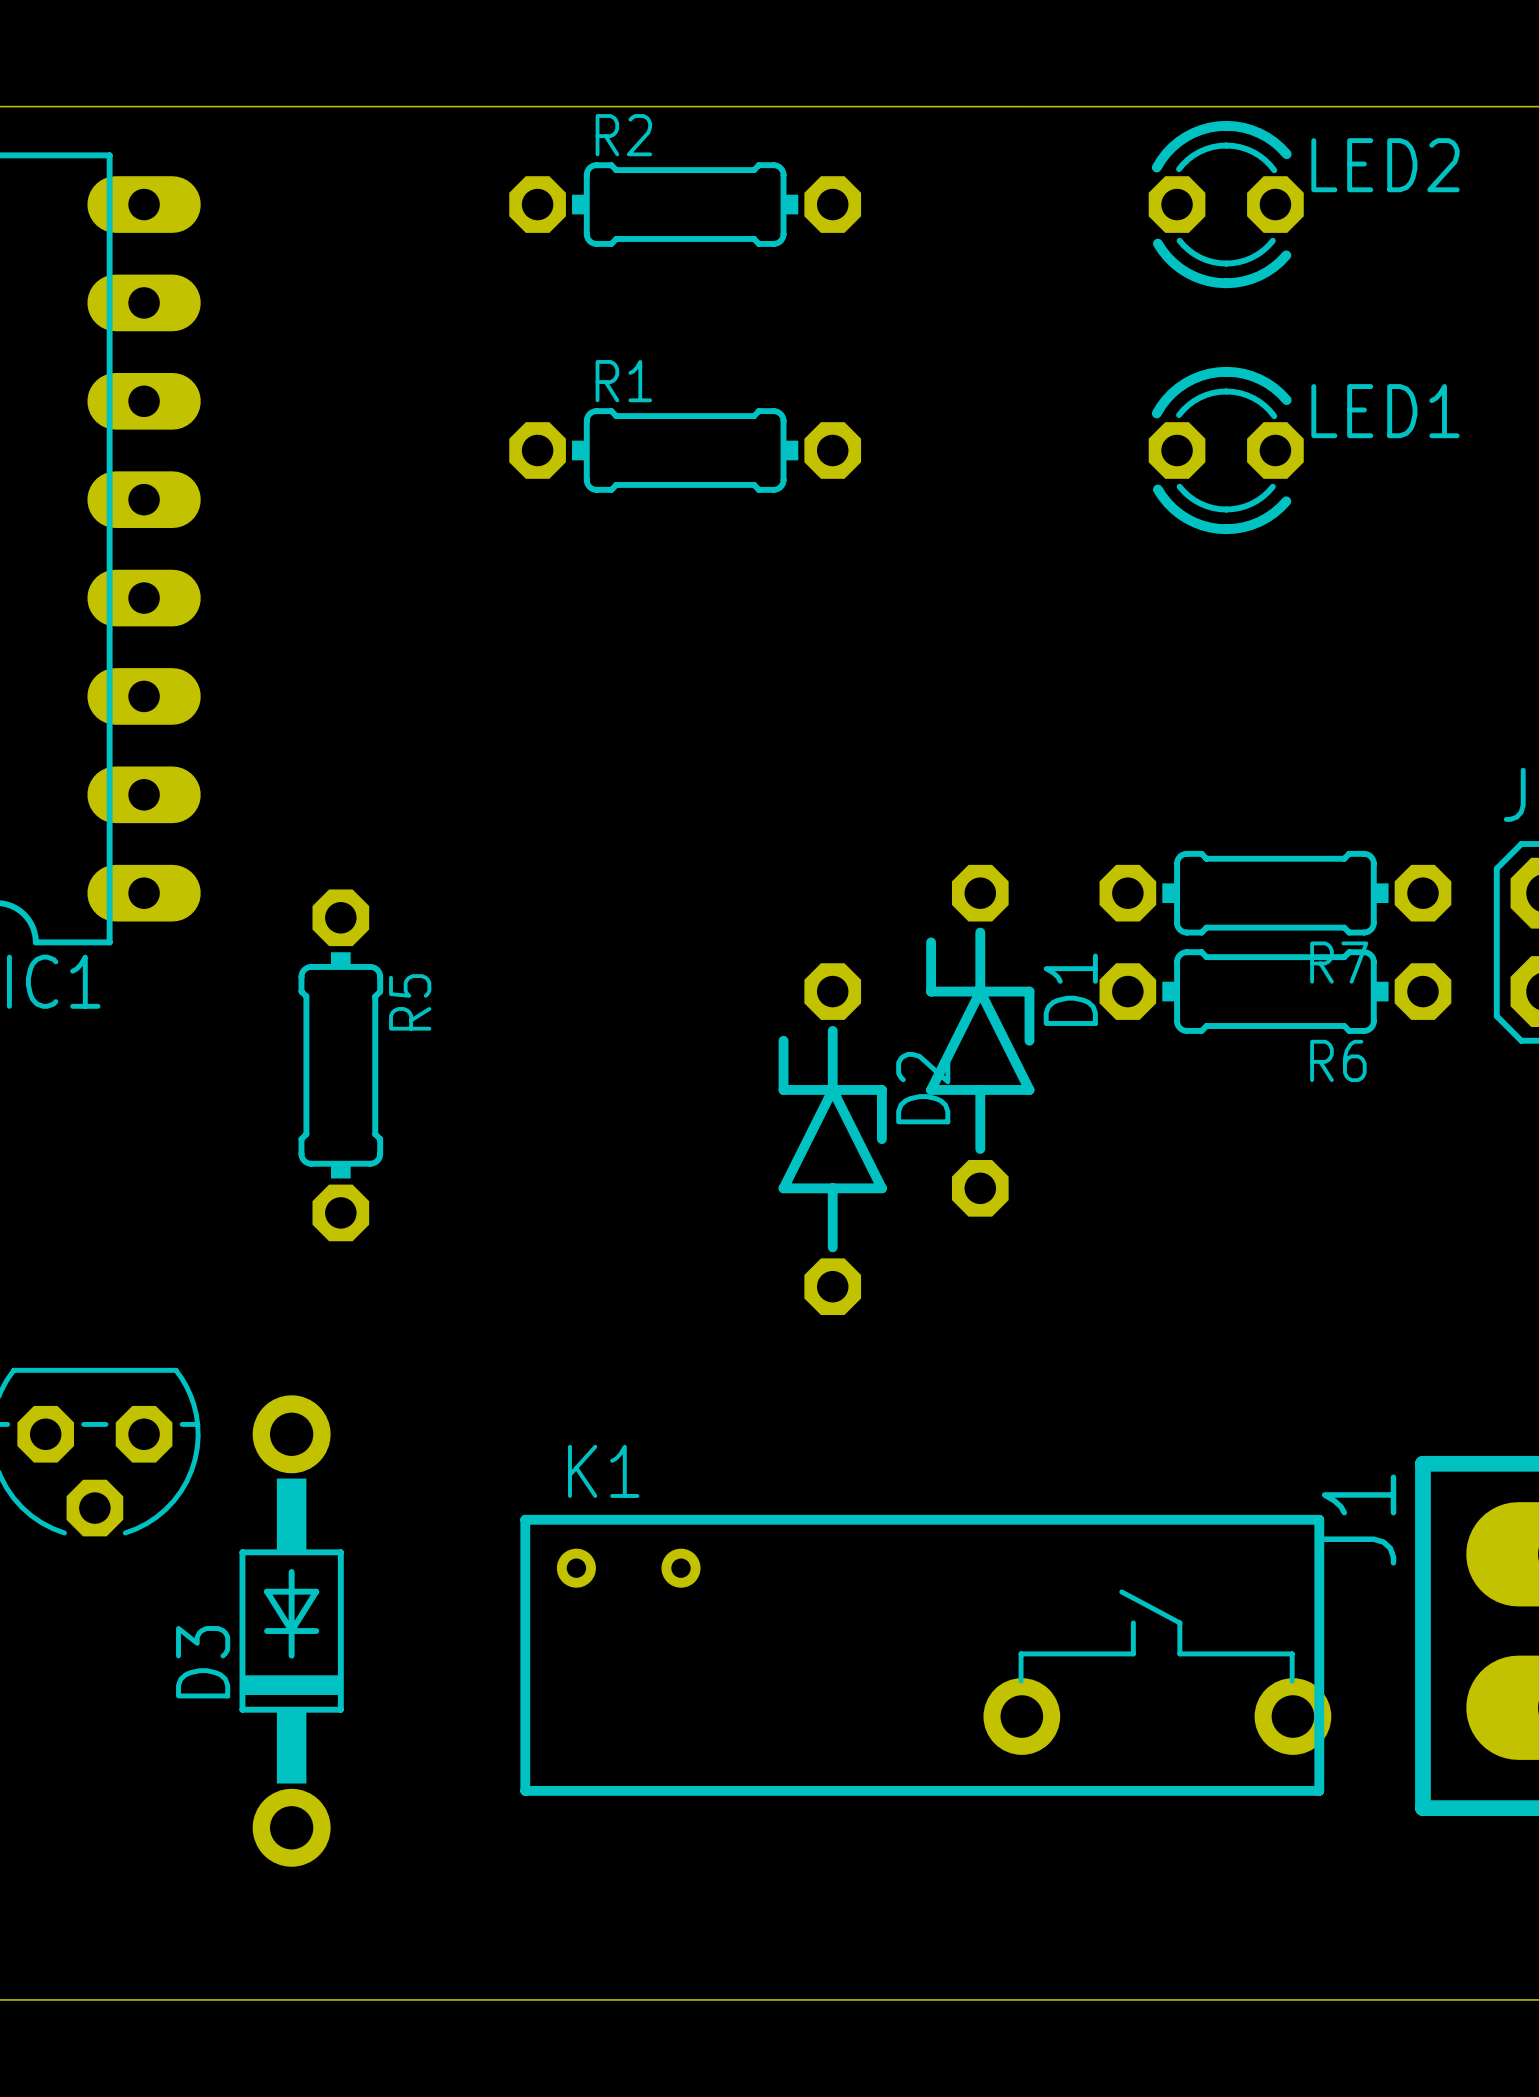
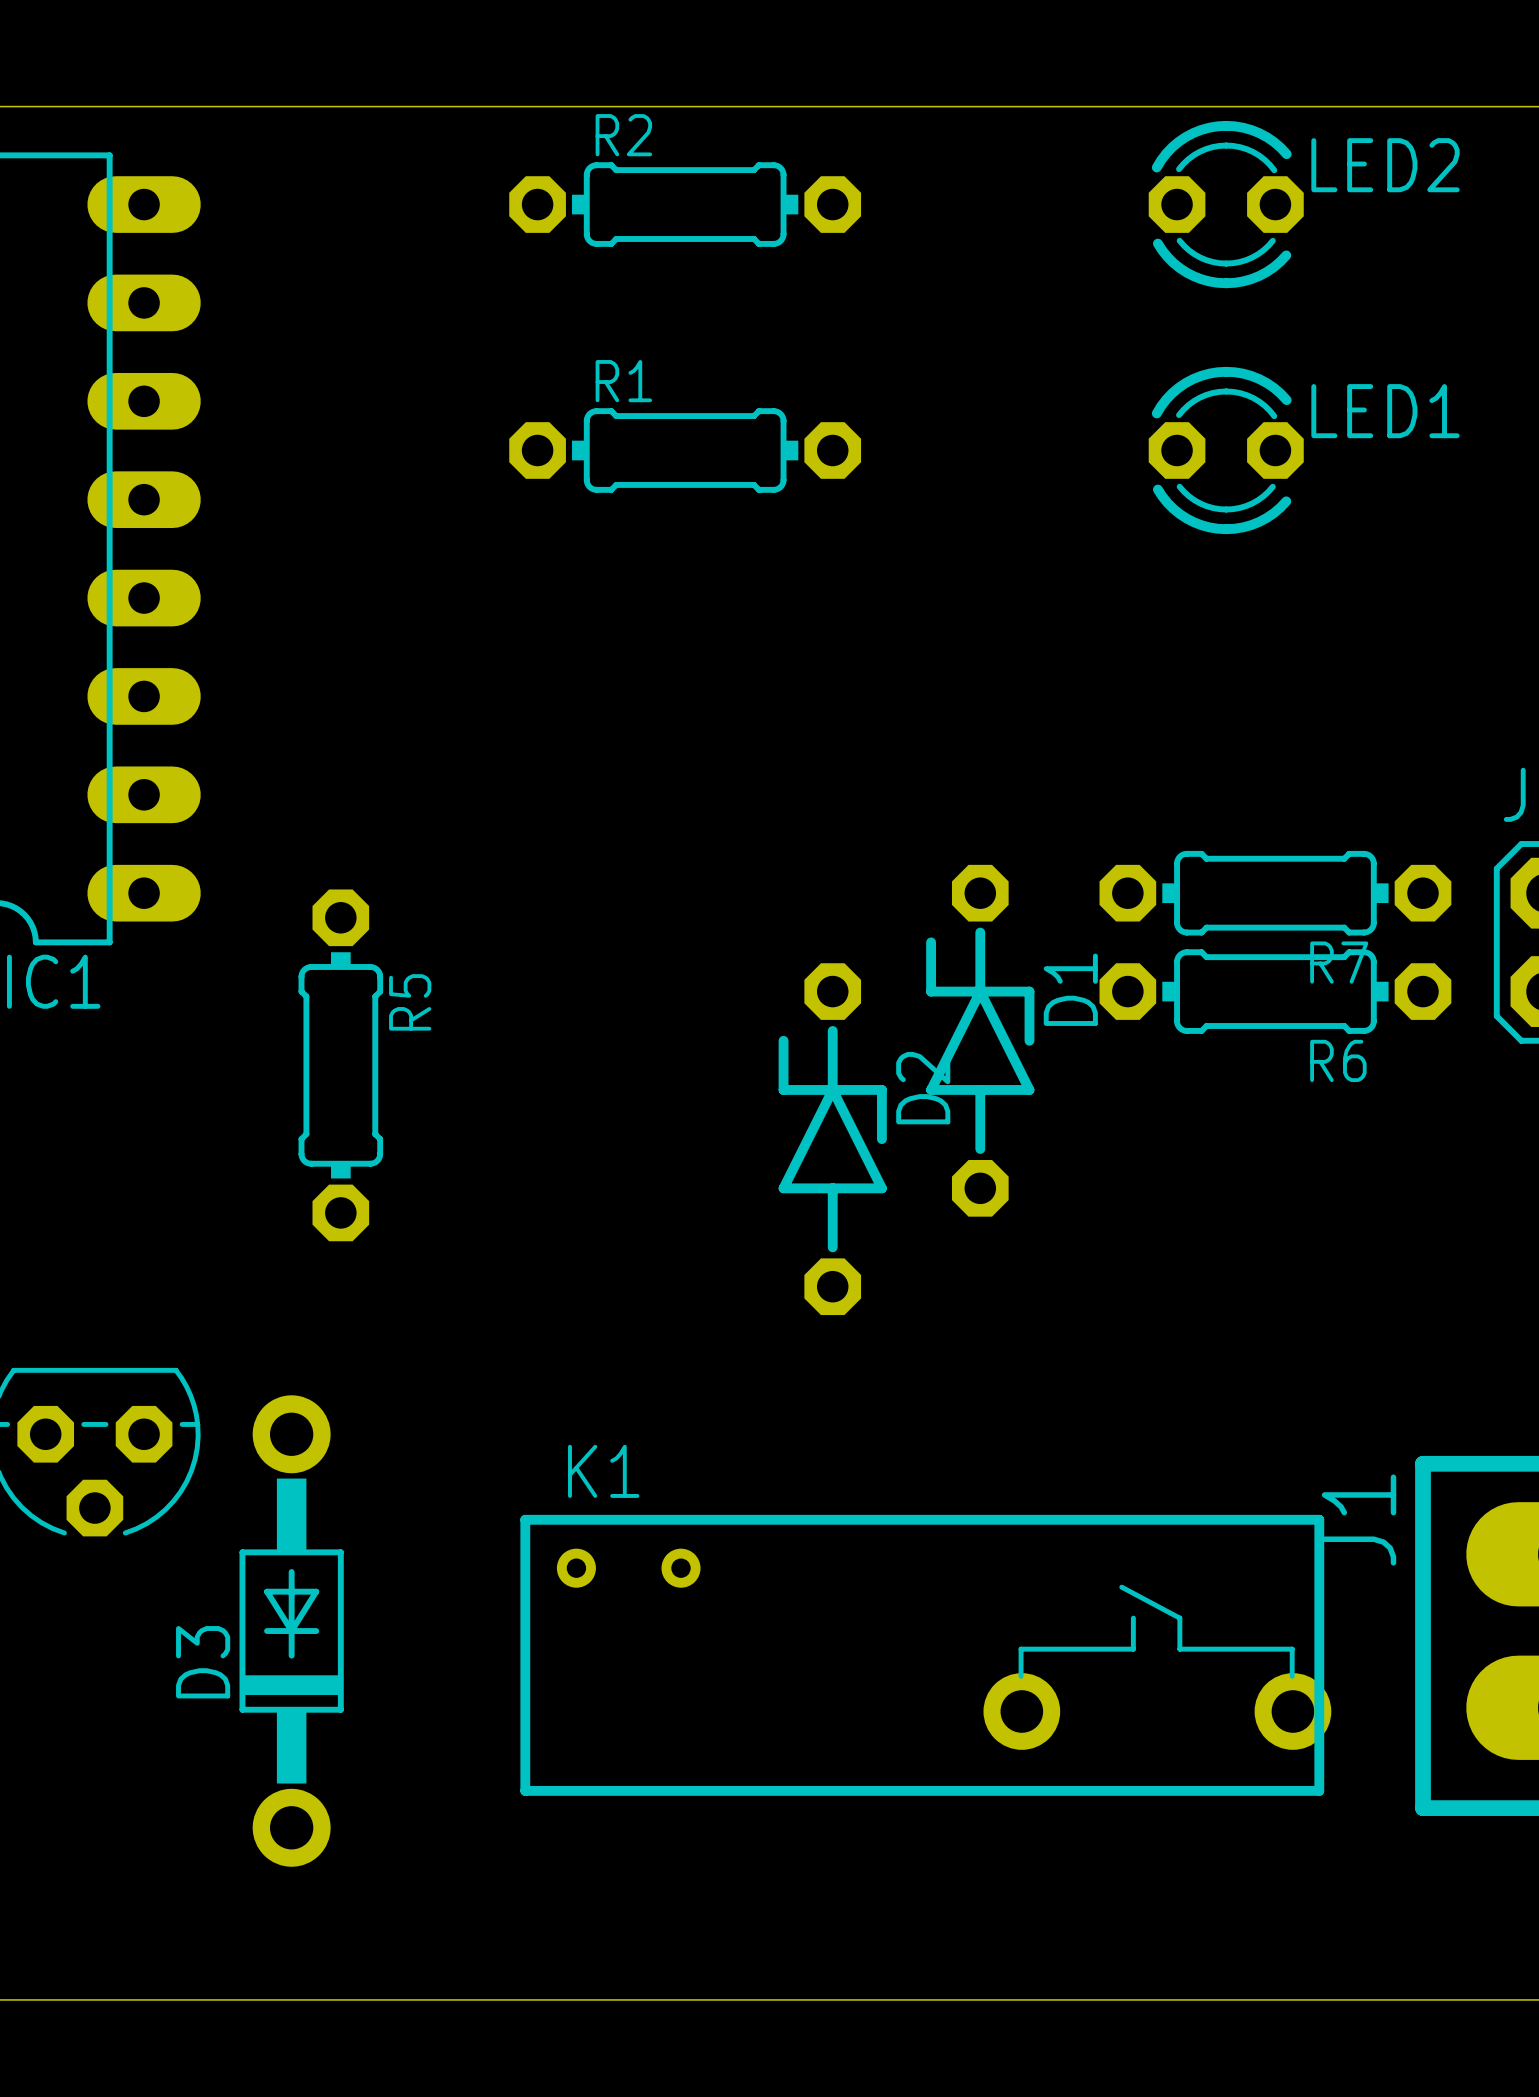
K1 footprint: [520, 1514, 1332, 1796] -> [520, 1514, 1332, 1796]

